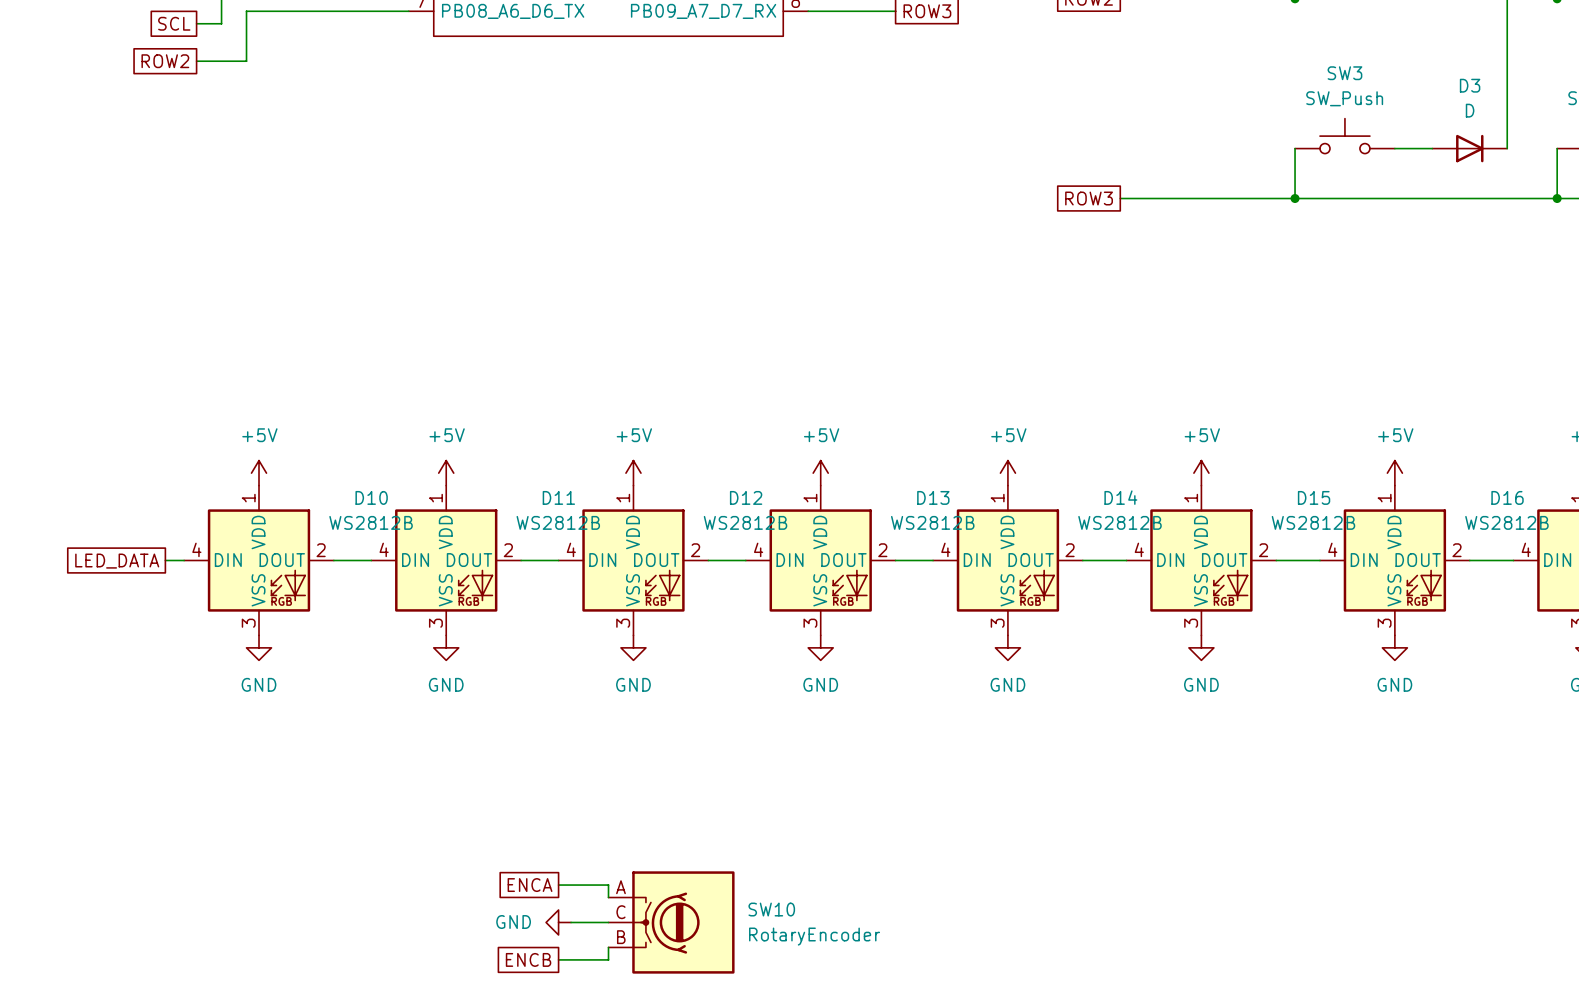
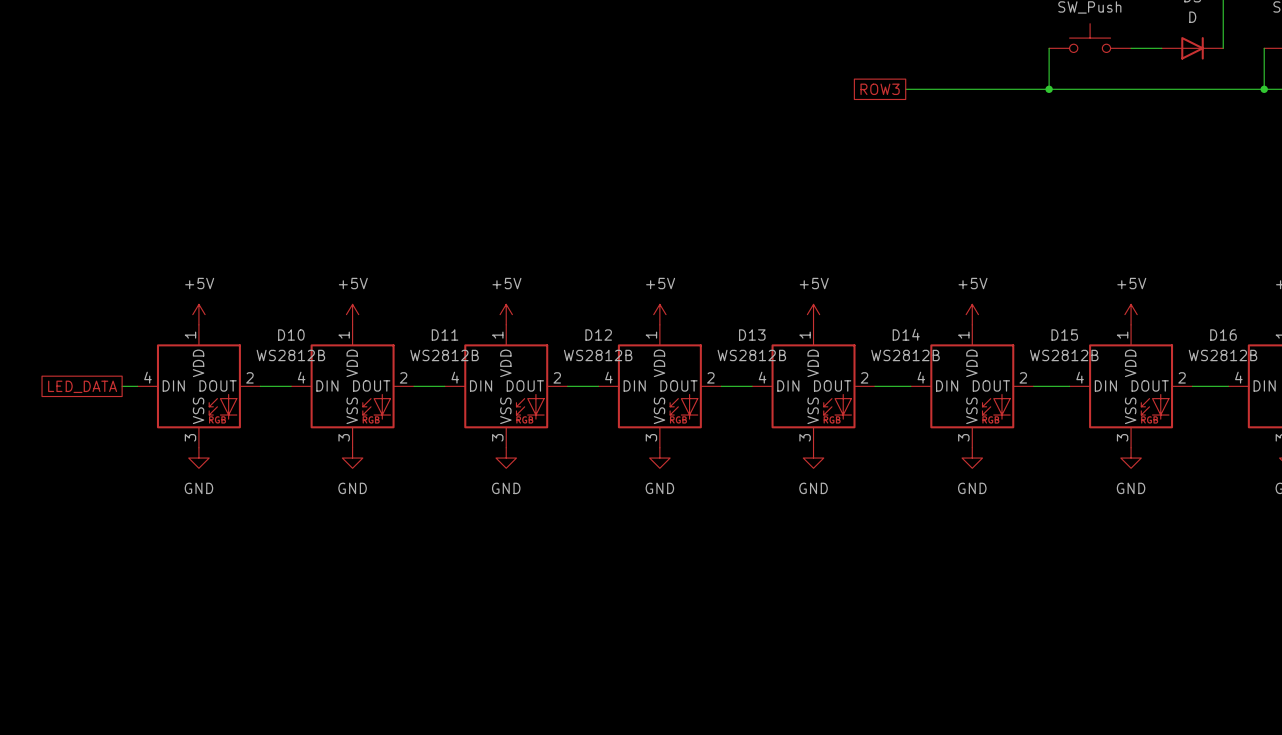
global label: ENCA (530, 885) -> none
wire: (558, 885) (608, 885) (608, 897) -> none
power symbol: GND (558, 922) -> none
wire: (571, 922) (608, 922) -> none
SW10: RotaryEncoder (671, 922) -> none
wire: (608, 947) (608, 959) (558, 959) -> none
global label: ENCB (528, 959) -> none

